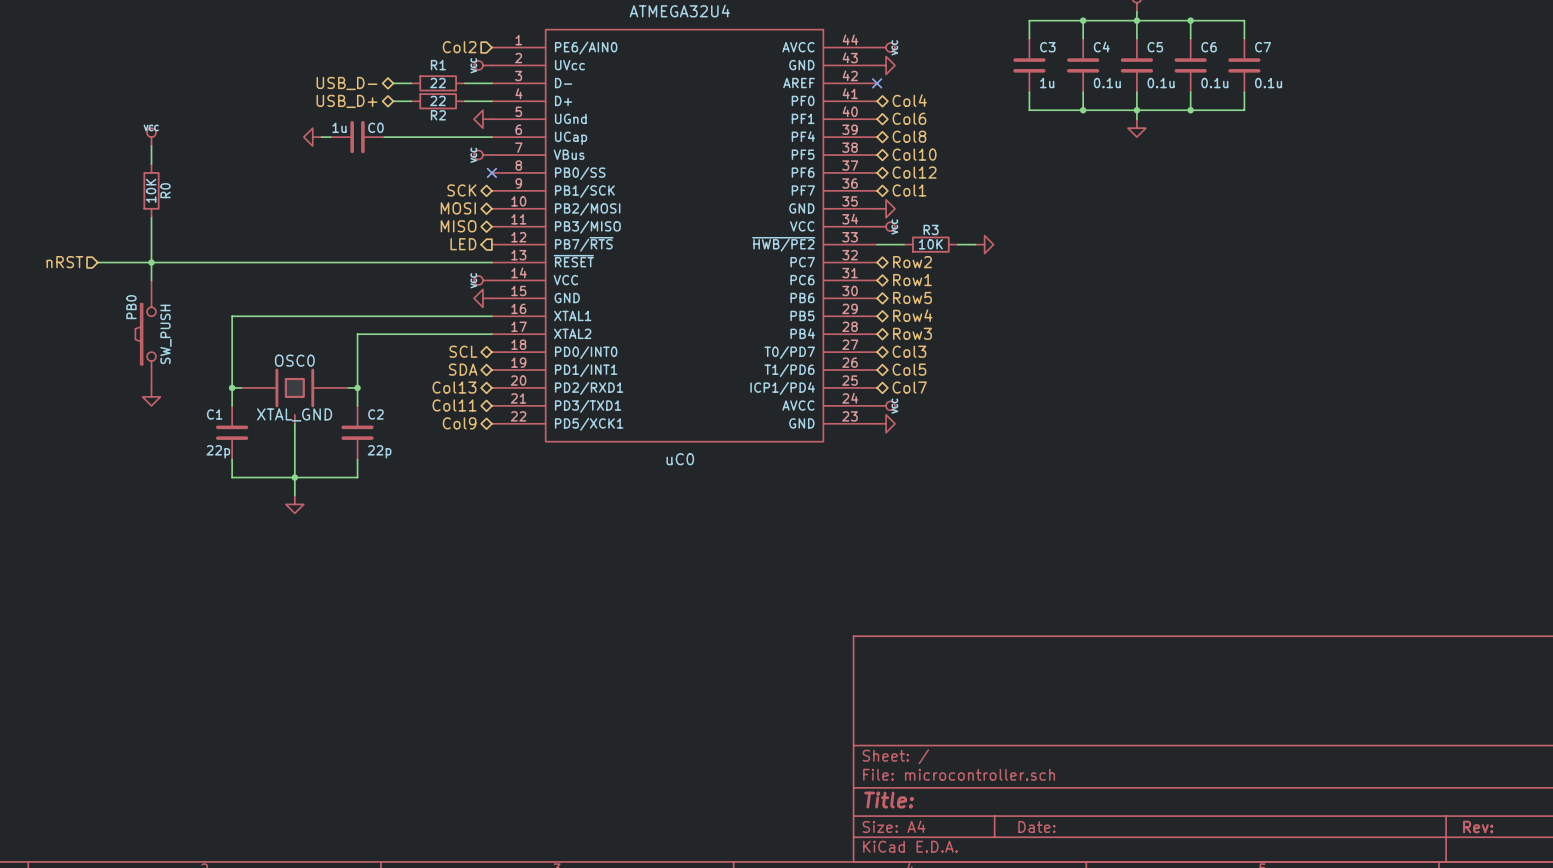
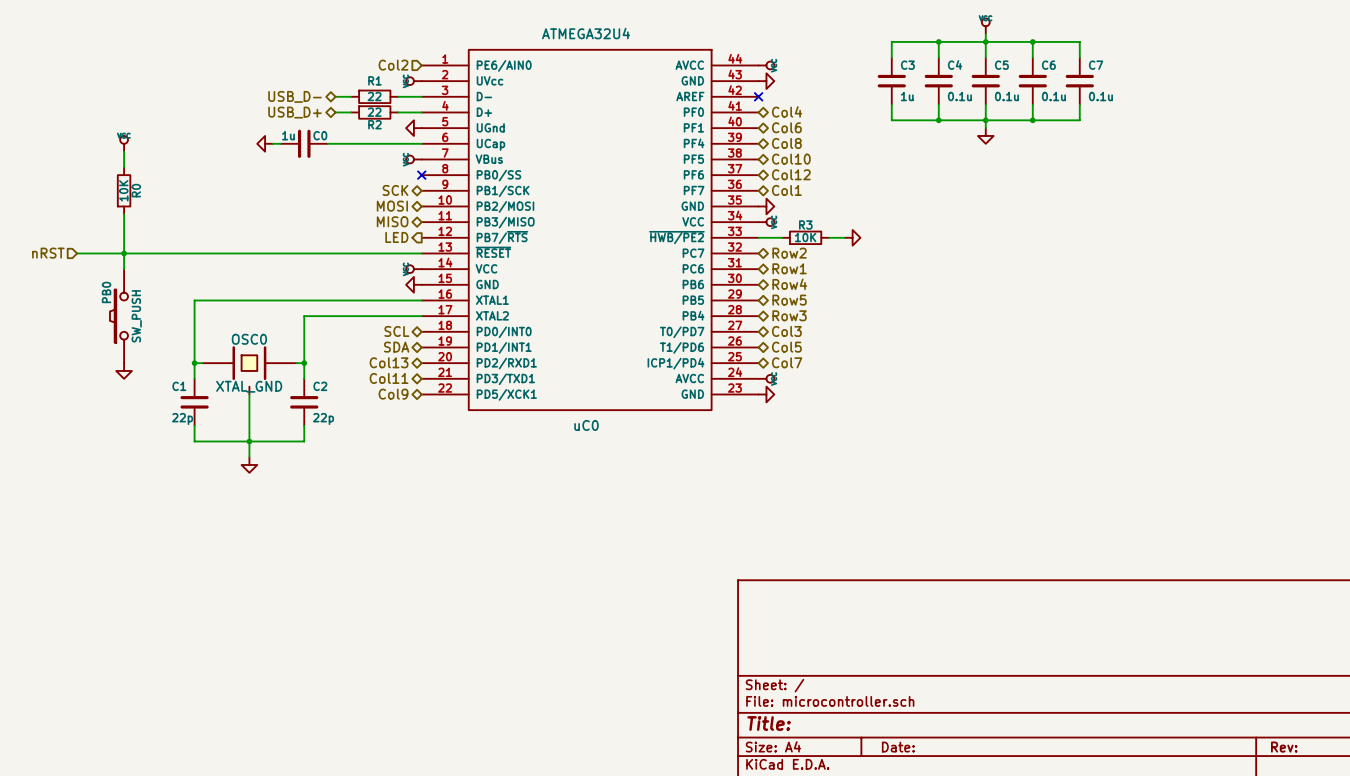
hierarchical label: Row5 (912, 297) -> Row4 (789, 284)
hierarchical label: Row4 (912, 315) -> Row5 (789, 300)

